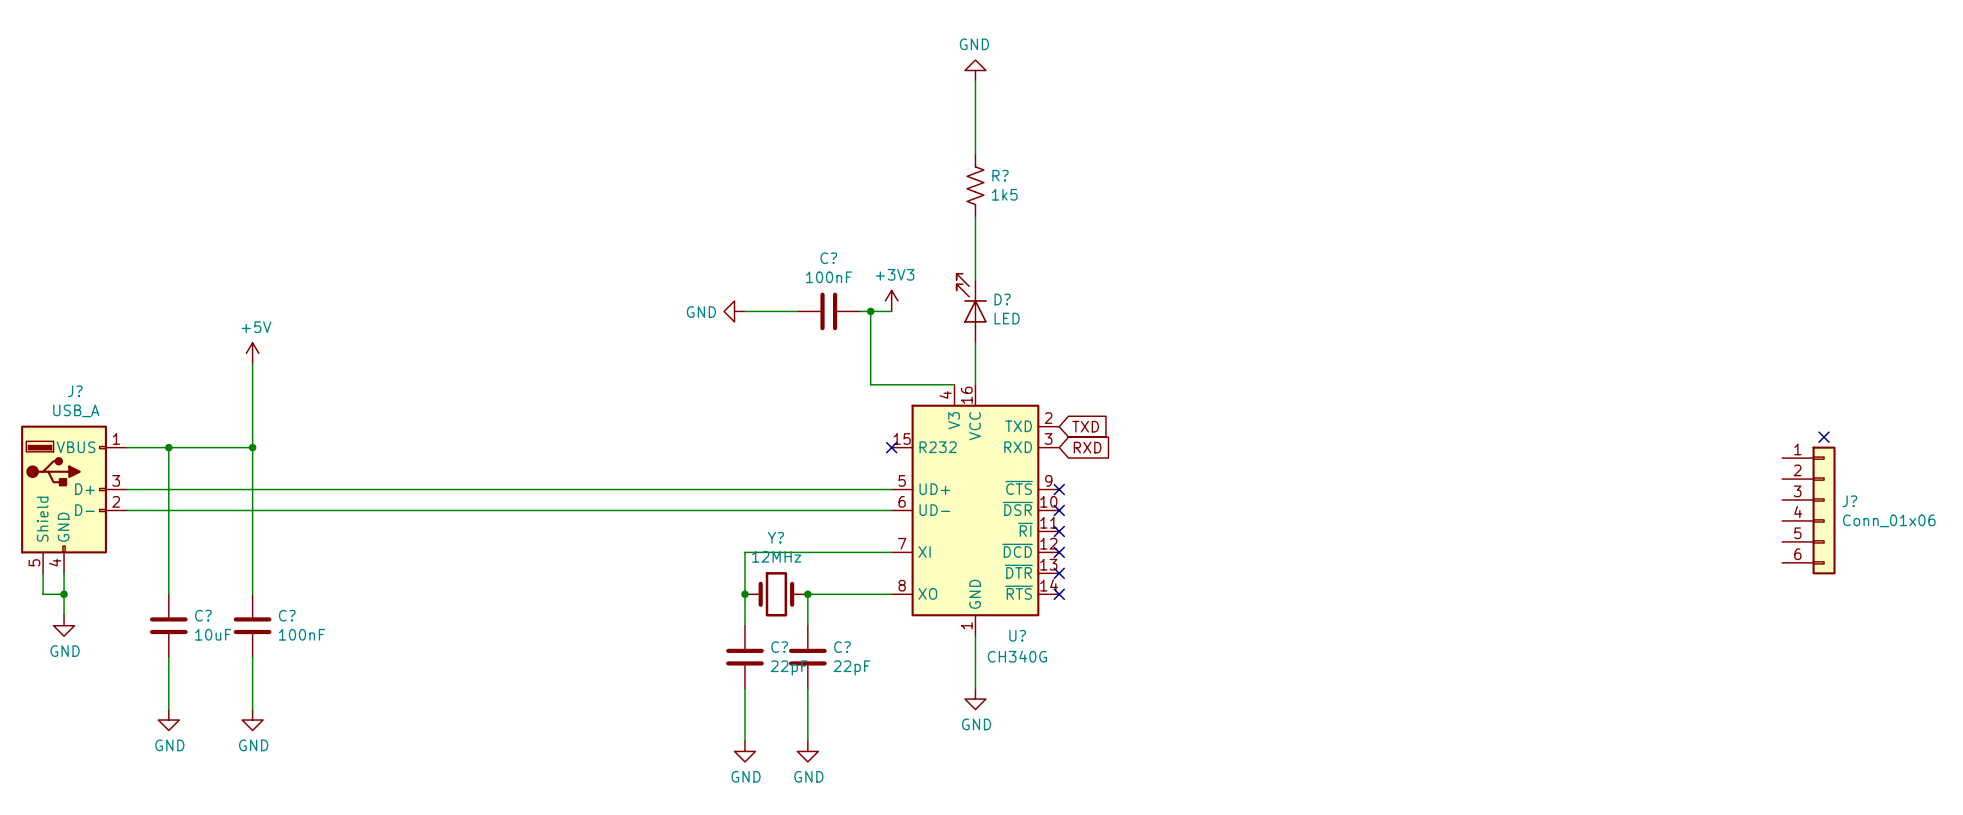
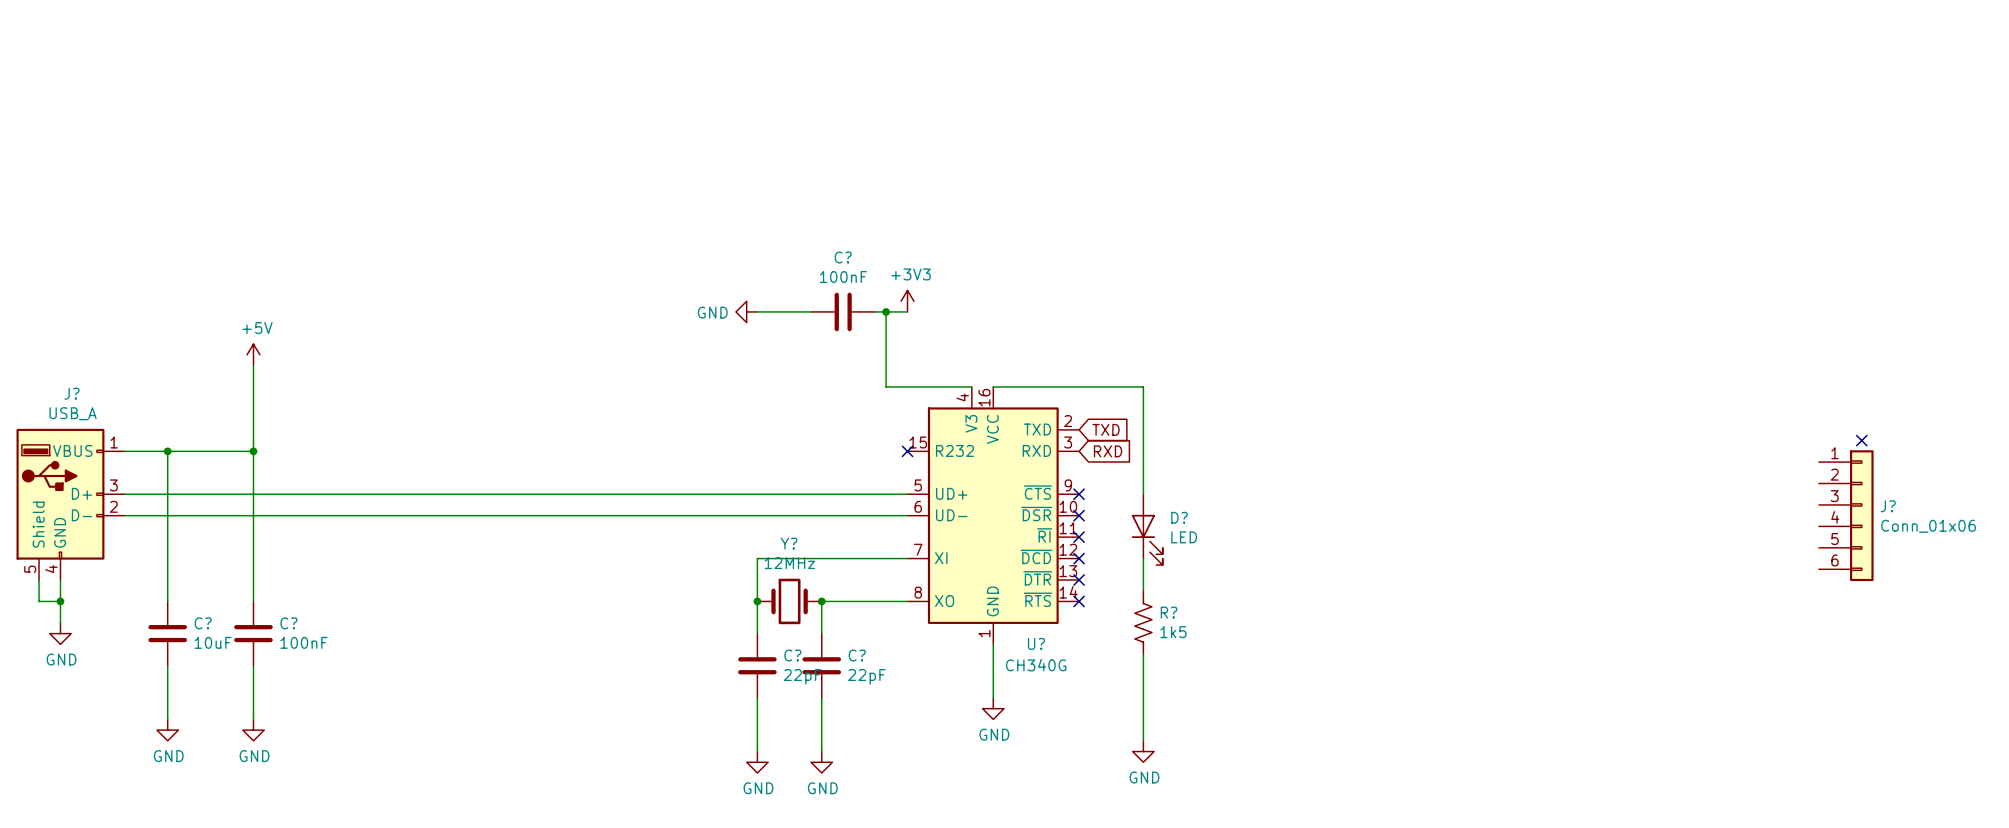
power symbol: GND (975, 70) -> none
wire: (975, 80) (975, 154) -> none
R?: 1k5 (975, 185) -> none
wire: (975, 217) (975, 280) -> none
D?: LED (971, 308) -> none
wire: (975, 342) (975, 384) -> (1143, 494) (1143, 387) (993, 387)
D?: none -> LED (1147, 529)
wire: none -> (1143, 558) (1143, 590)
R?: none -> 1k5 (1143, 622)
wire: none -> (1143, 655) (1143, 740)
power symbol: none -> GND (1143, 751)

